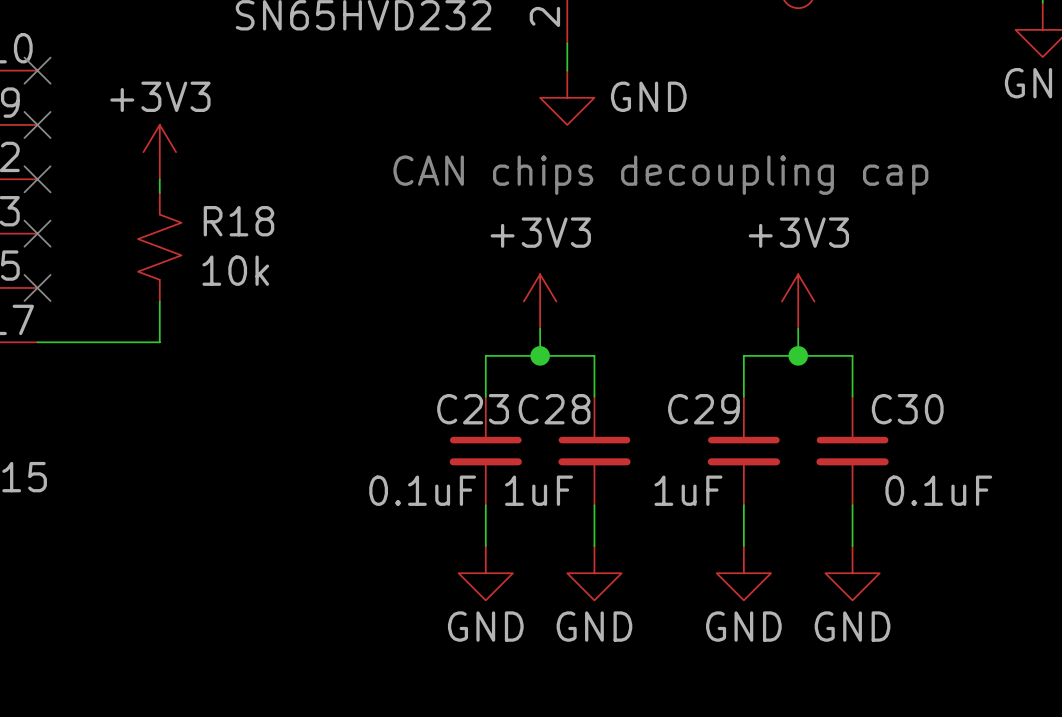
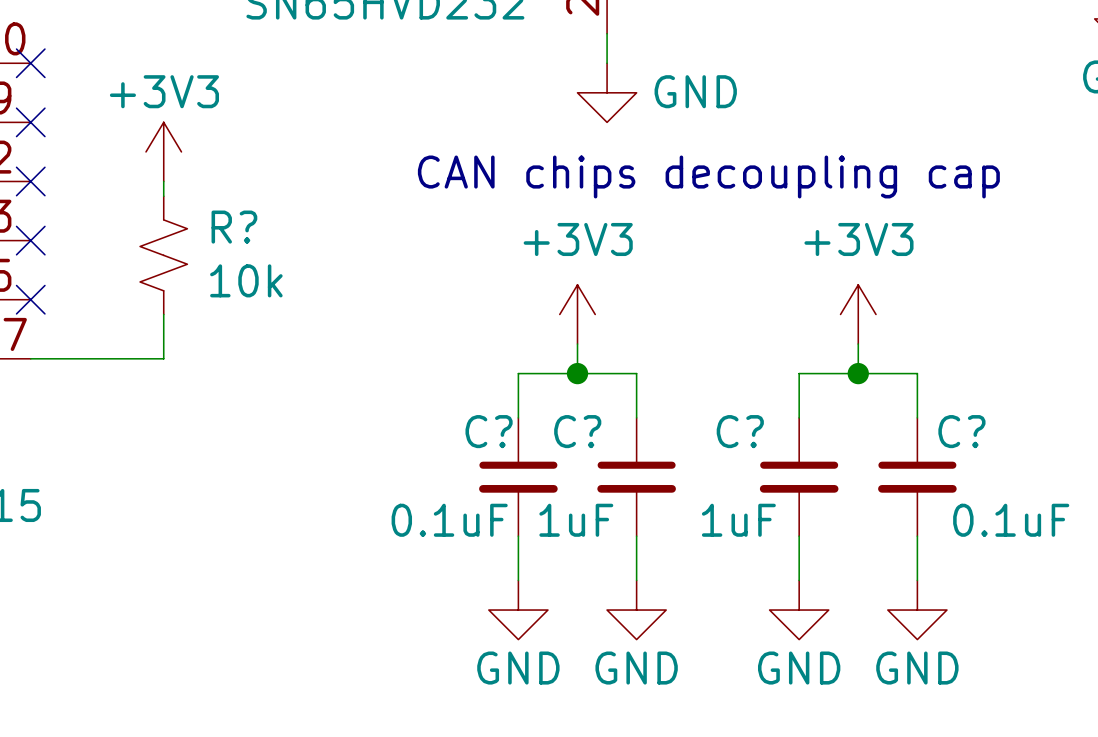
R18 name: R18 (238, 221) -> R? (234, 227)
C23 name: C23 (473, 409) -> C? (489, 431)
C28 name: C28 (554, 409) -> C? (577, 431)
C29 name: C29 (703, 409) -> C? (740, 431)
C30 name: C30 (907, 409) -> C? (961, 431)

